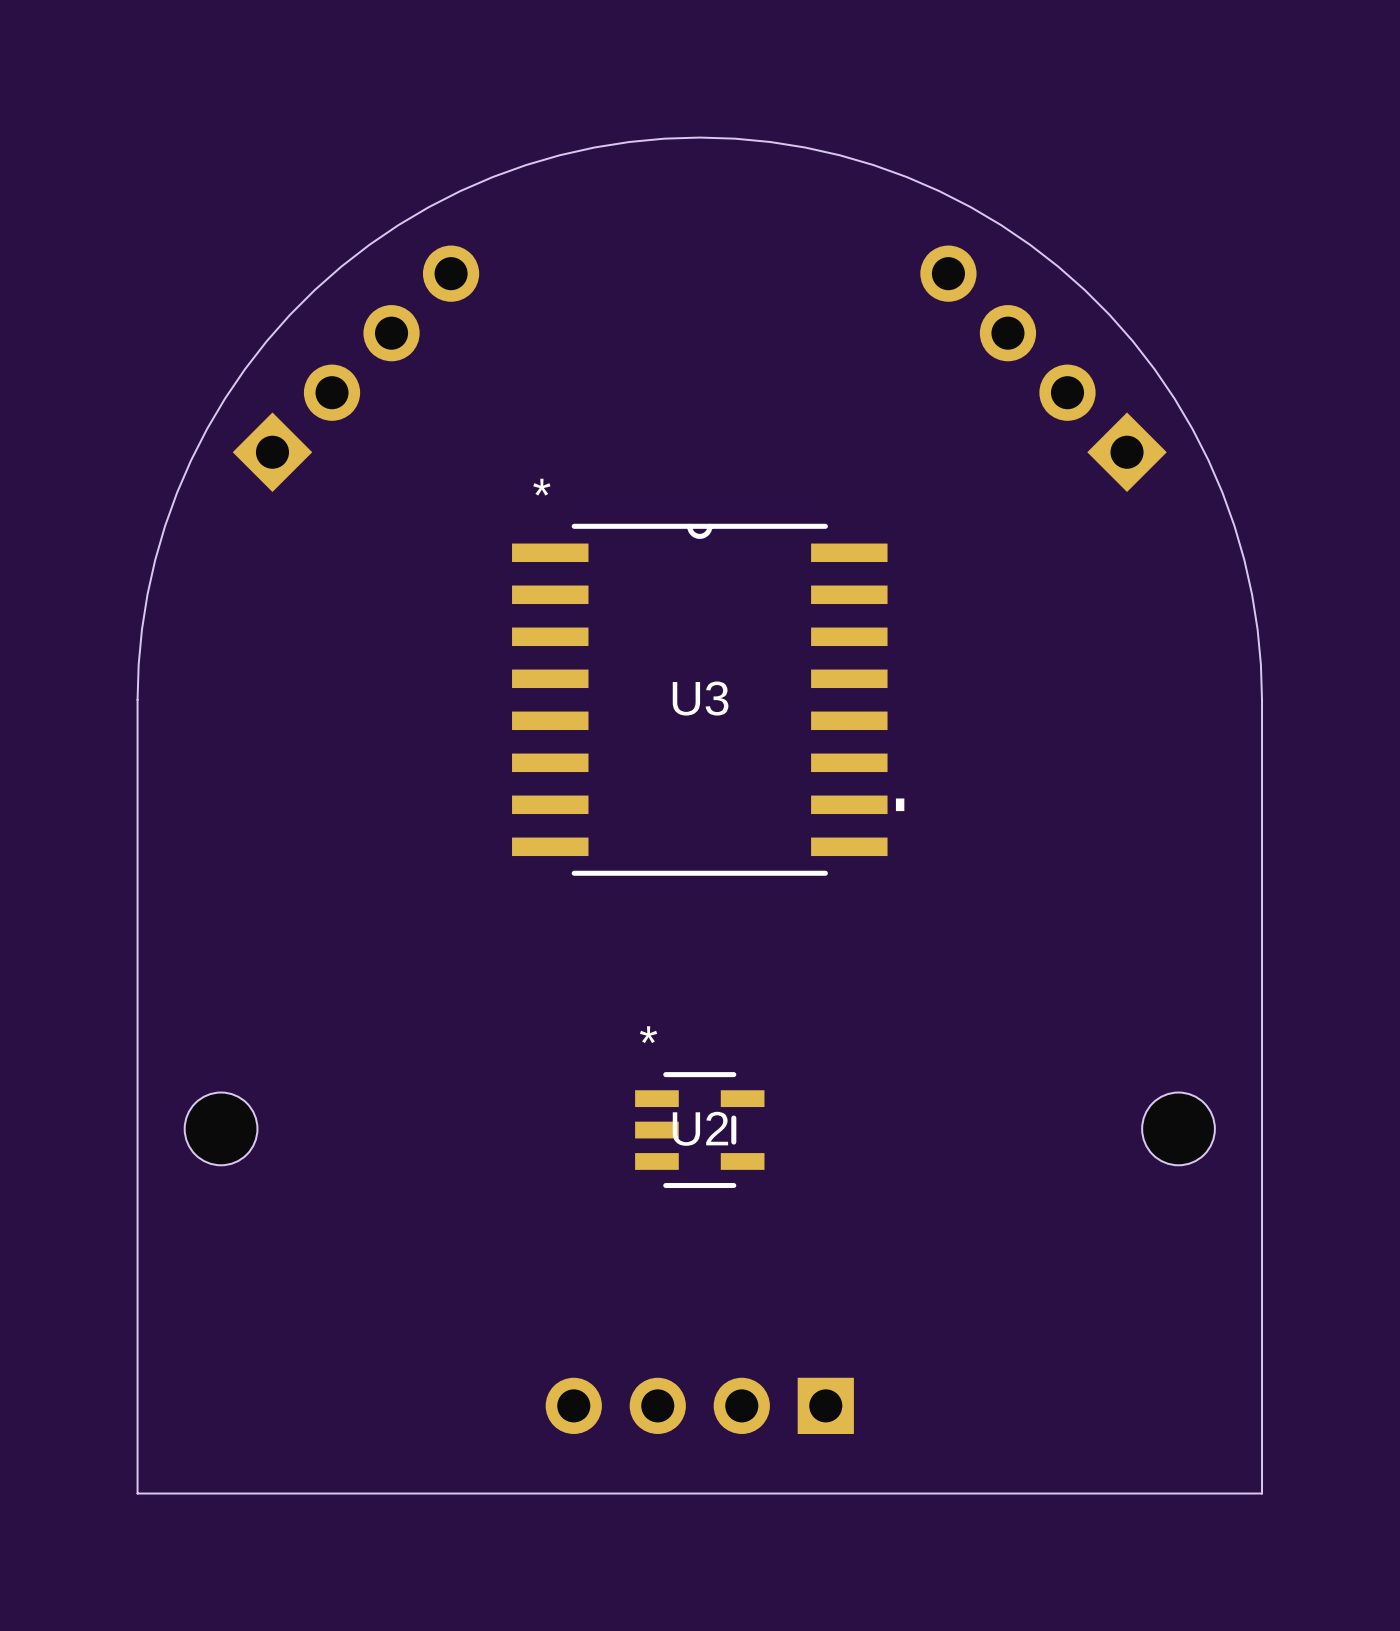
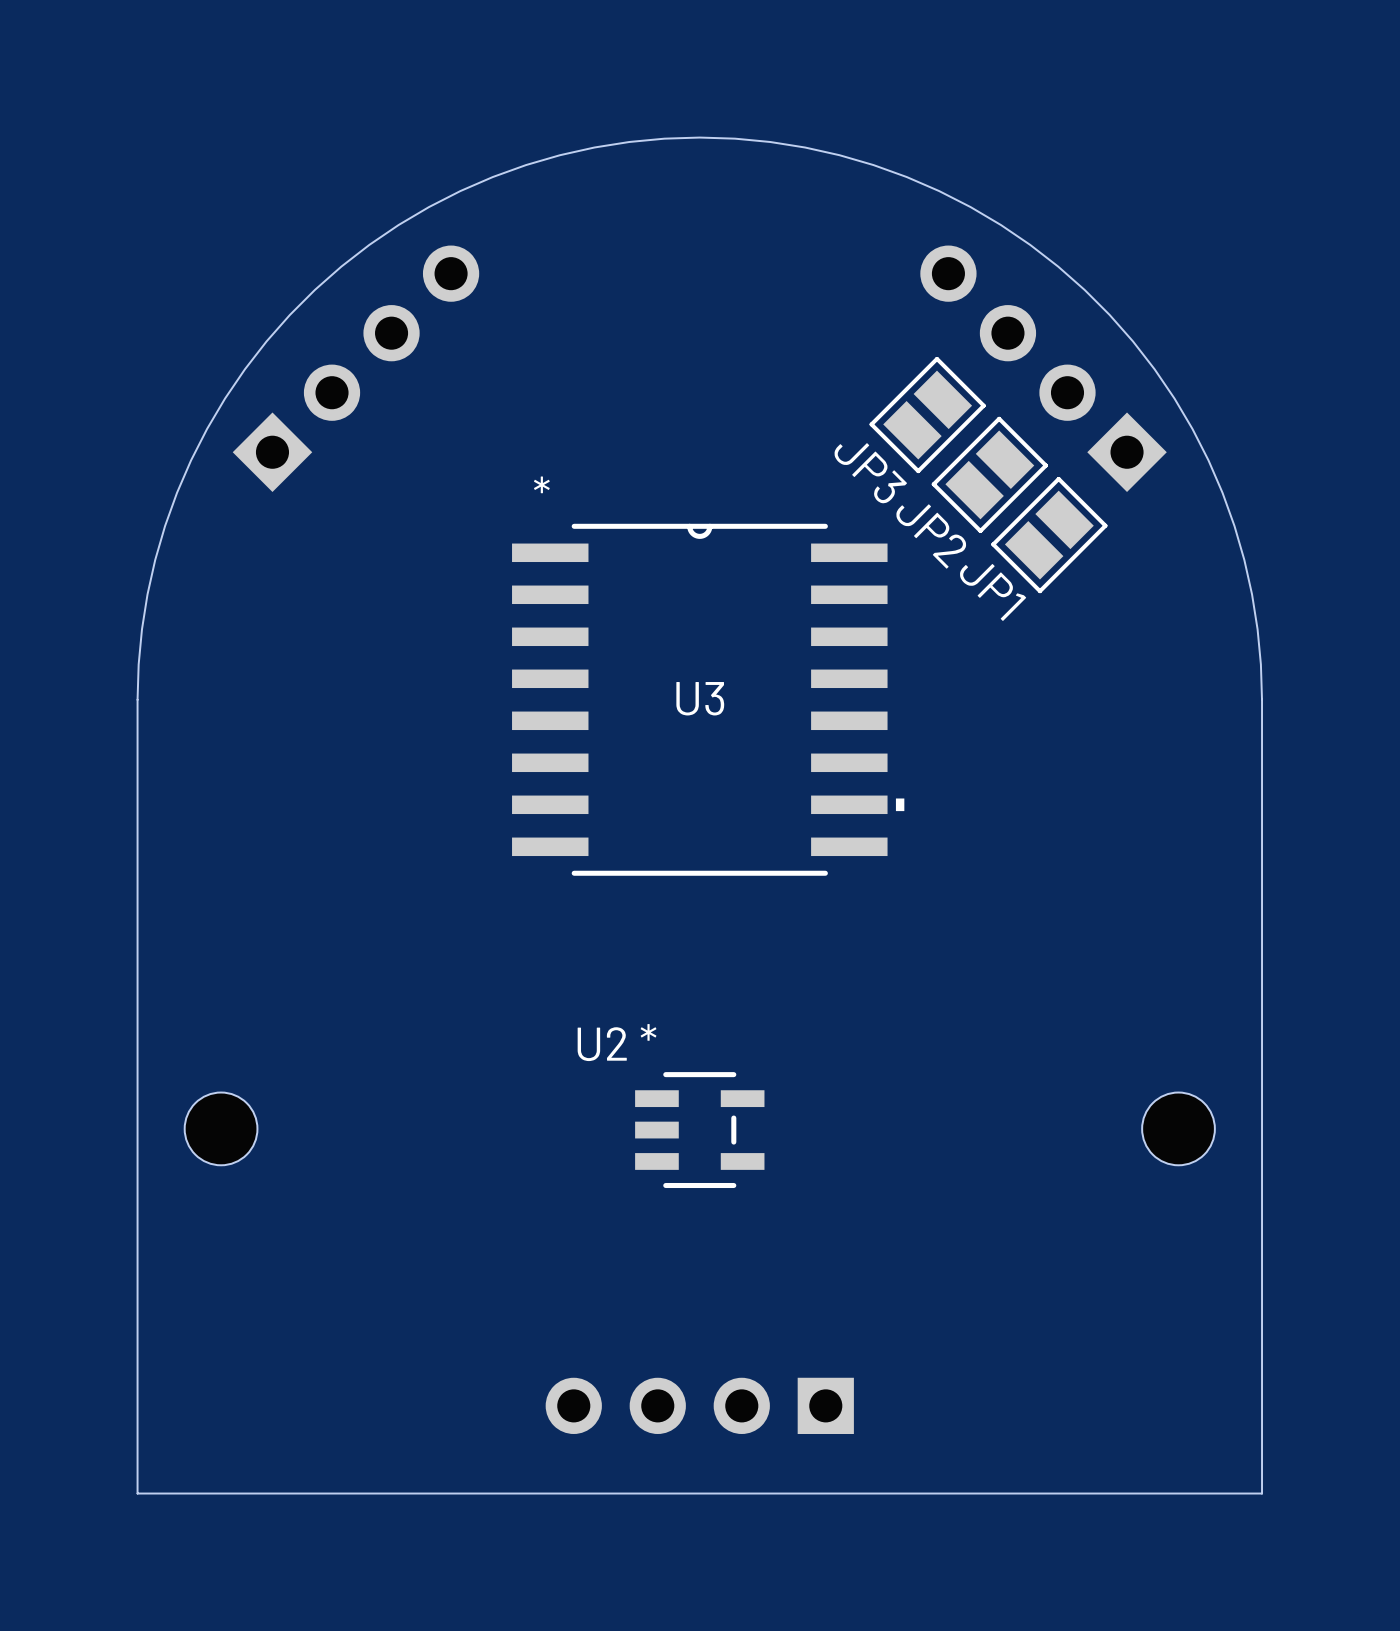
JP3: none -> (927, 415)
JP2: none -> (989, 474)
JP1: none -> (1049, 535)
U2 name position: U2 (700, 1128) -> U2 (602, 1044)

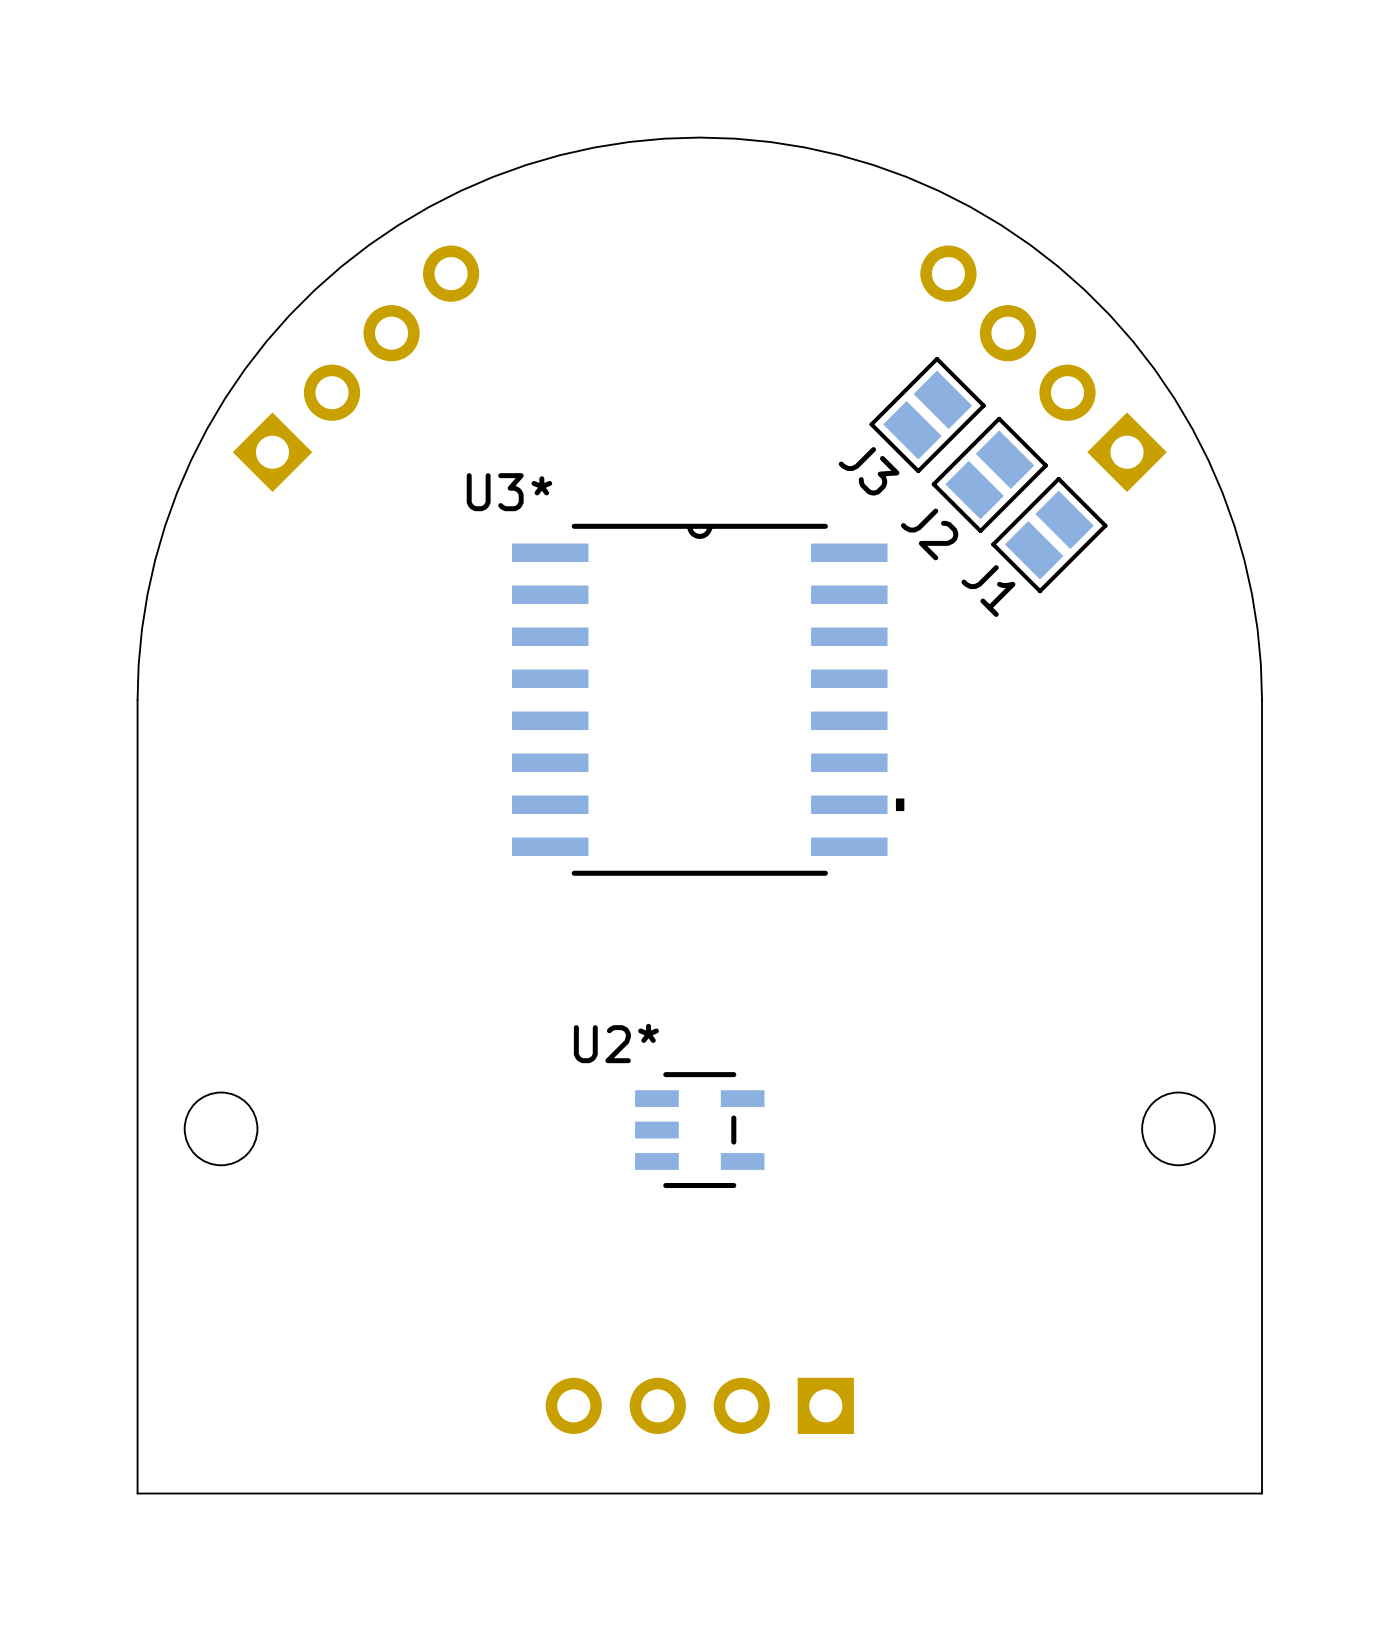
JP3 name: JP3 (870, 473) -> J3 (869, 471)
JP2 name: JP2 (931, 536) -> J2 (929, 534)
JP1 name: JP1 (992, 592) -> J1 (988, 591)
U3 name position: U3 (700, 698) -> U3 (495, 492)

